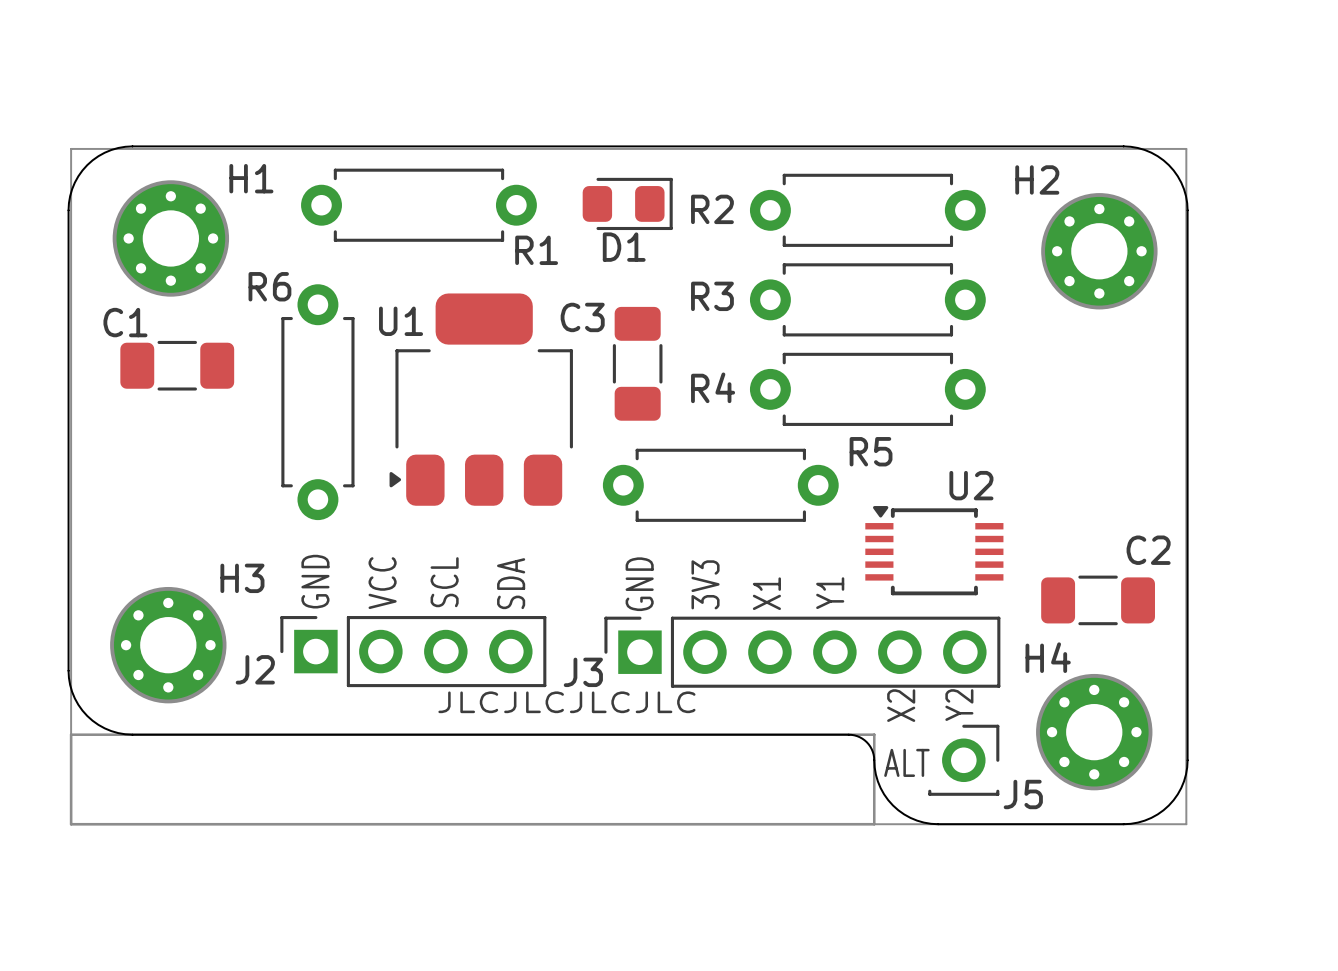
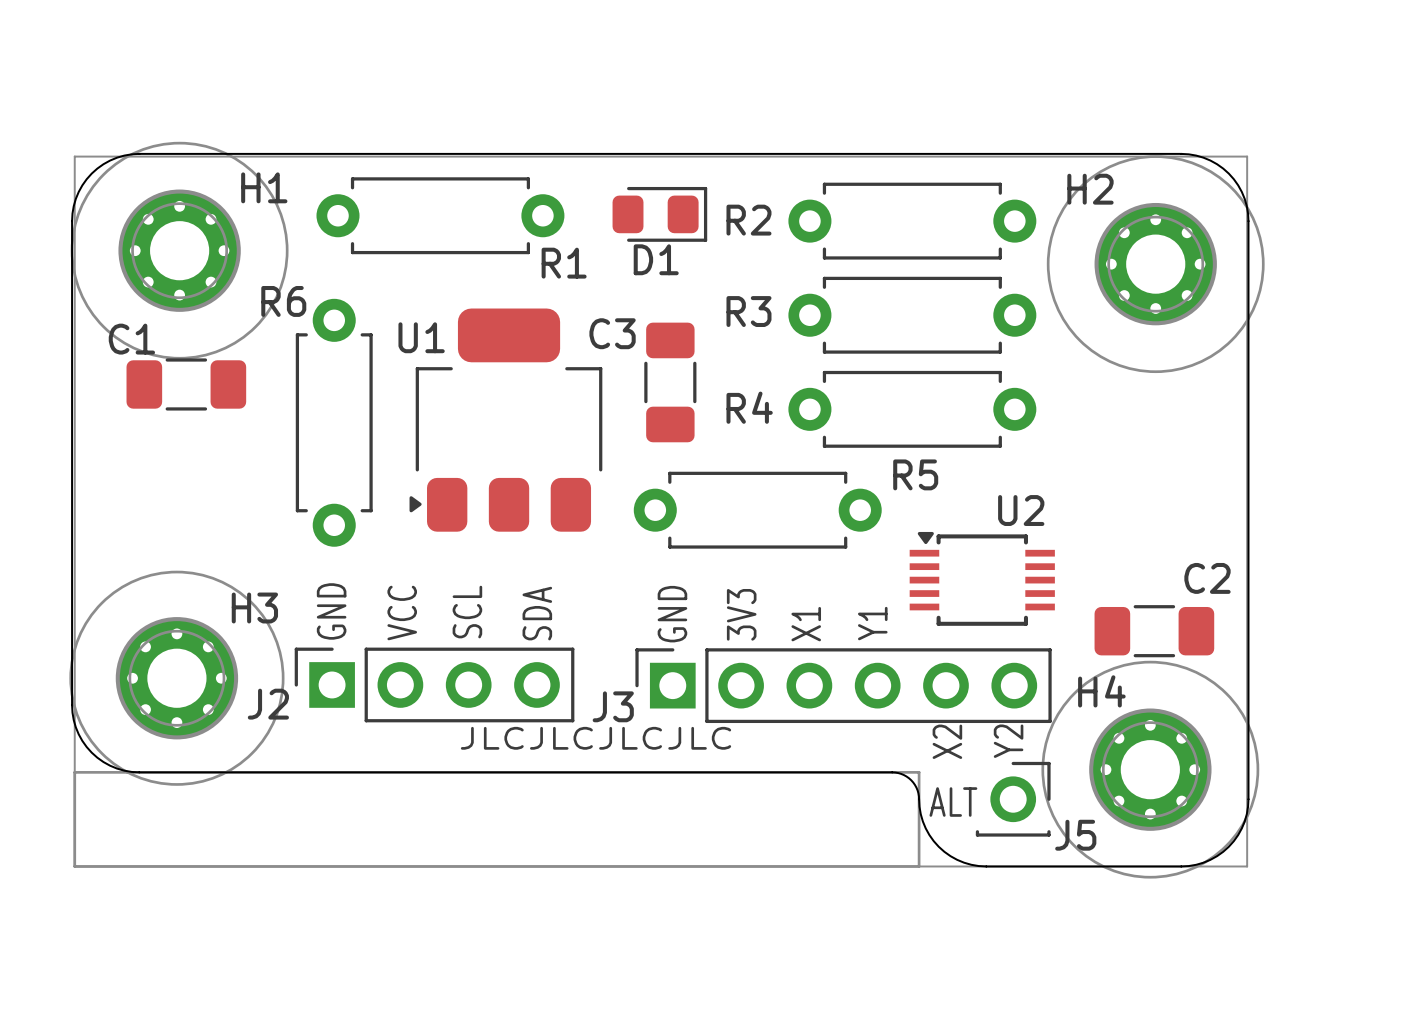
drawing: none -> [70, 141, 289, 360]
drawing: none -> [1046, 155, 1265, 374]
drawing: none -> [69, 570, 285, 786]
drawing: none -> [1041, 660, 1260, 879]

